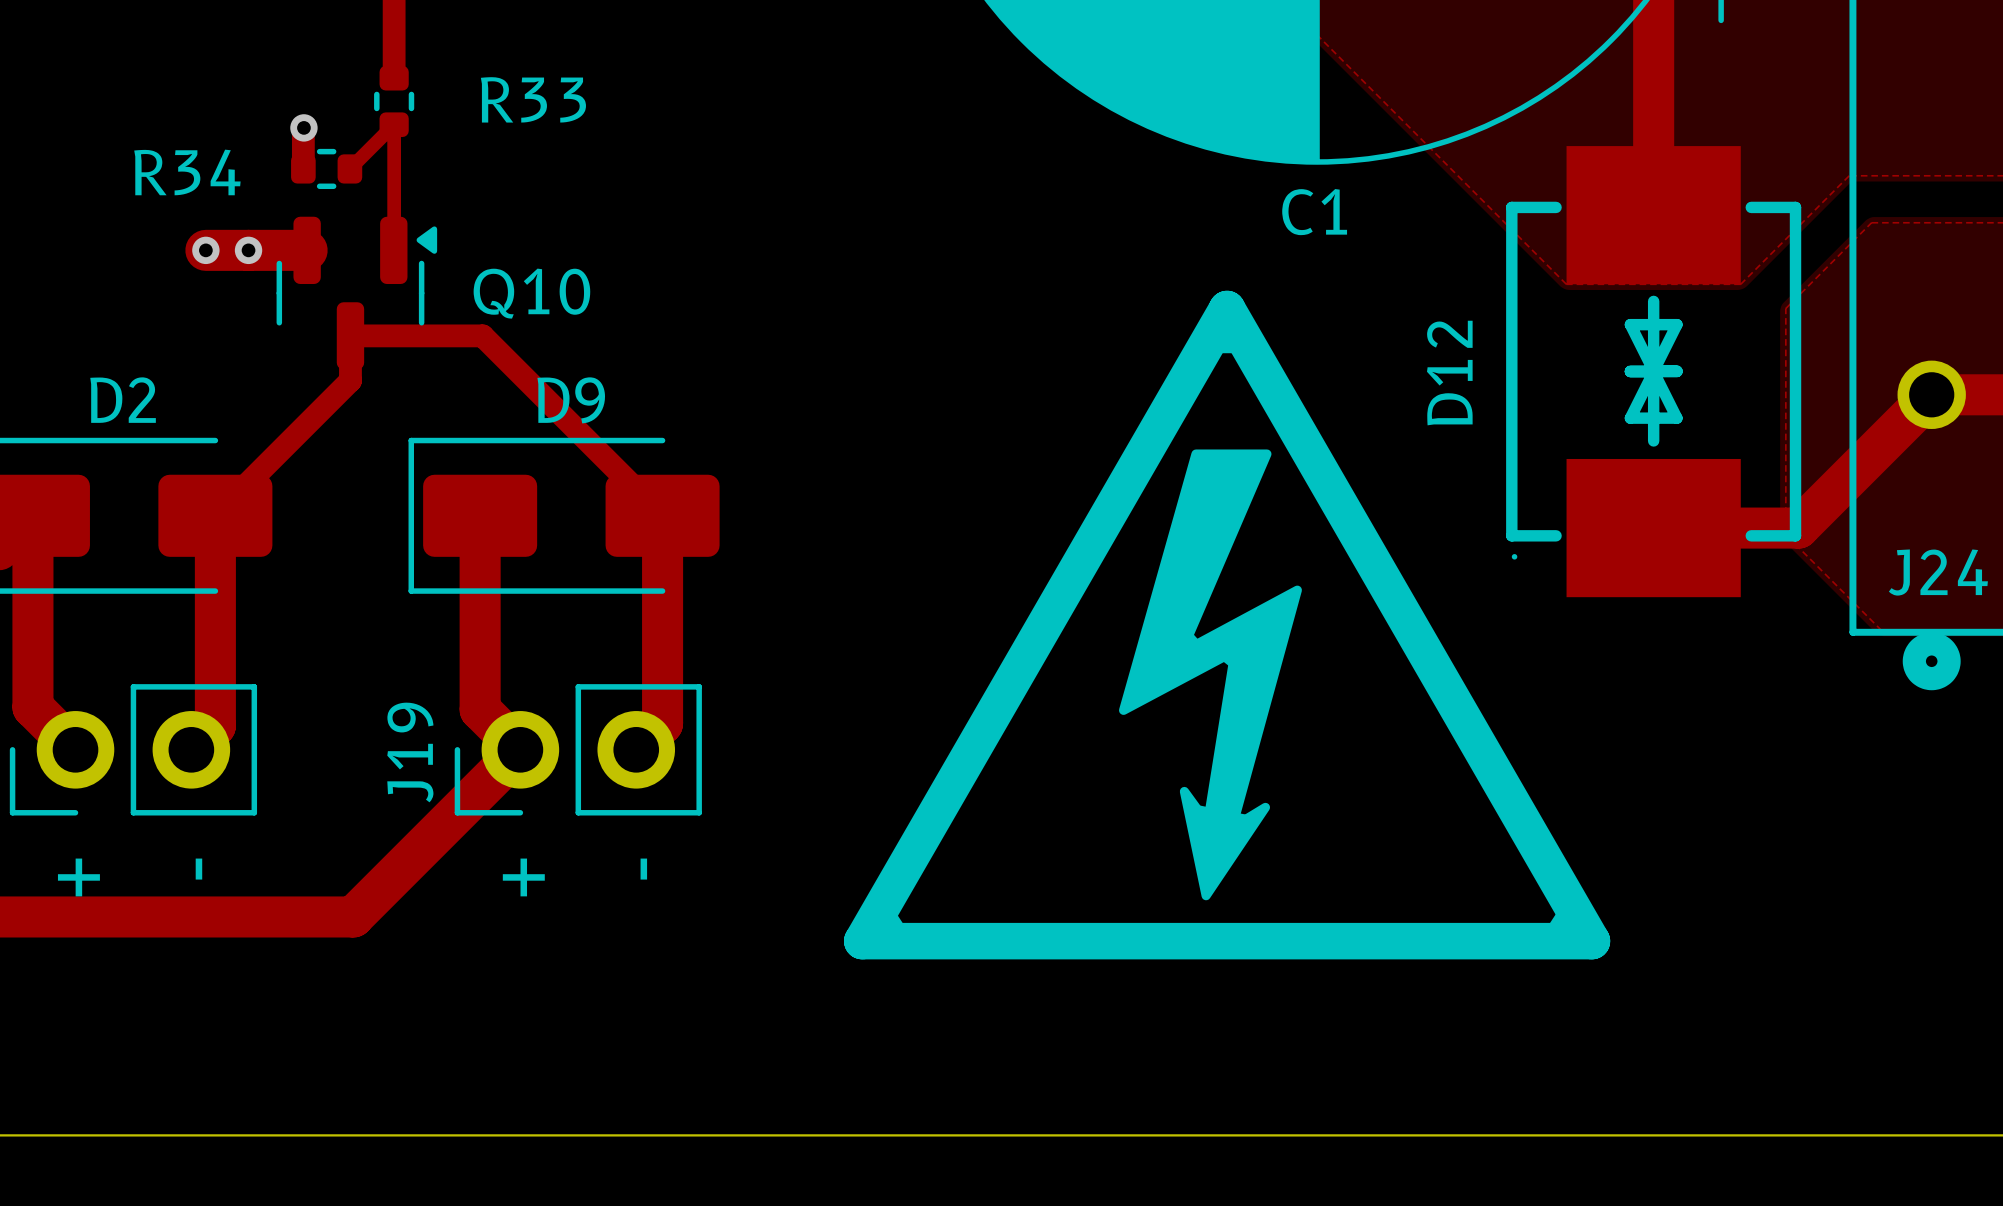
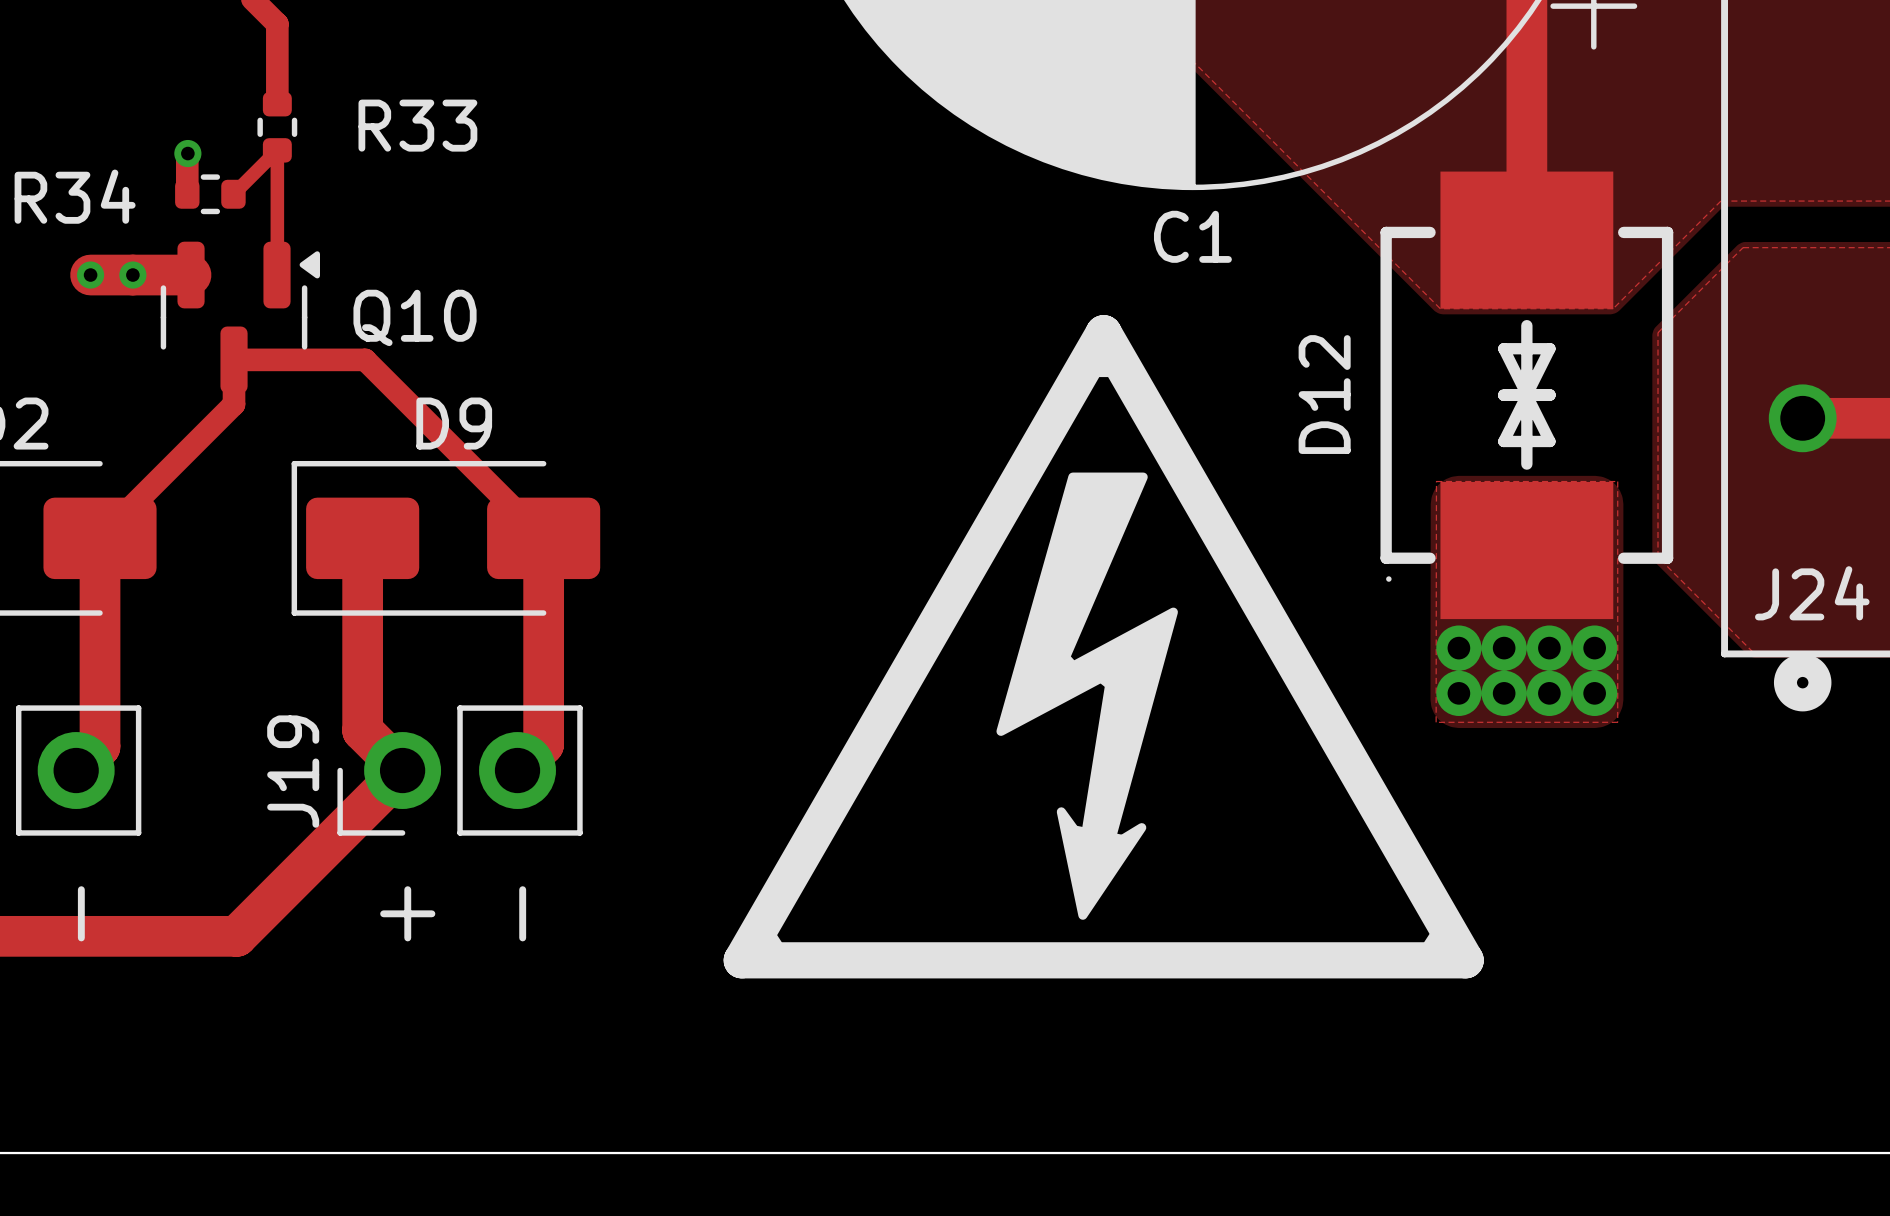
track: (1931, 394) (1798, 528) (1653, 528) -> none
zone outline: none -> (1436, 481) (1436, 722) (1617, 722) (1617, 481) (1436, 481)
via: none -> (1458, 648)
via: none -> (1504, 648)
via: none -> (1549, 648)
via: none -> (1594, 648)
via: none -> (1458, 693)
via: none -> (1504, 693)
via: none -> (1549, 693)
via: none -> (1594, 693)

